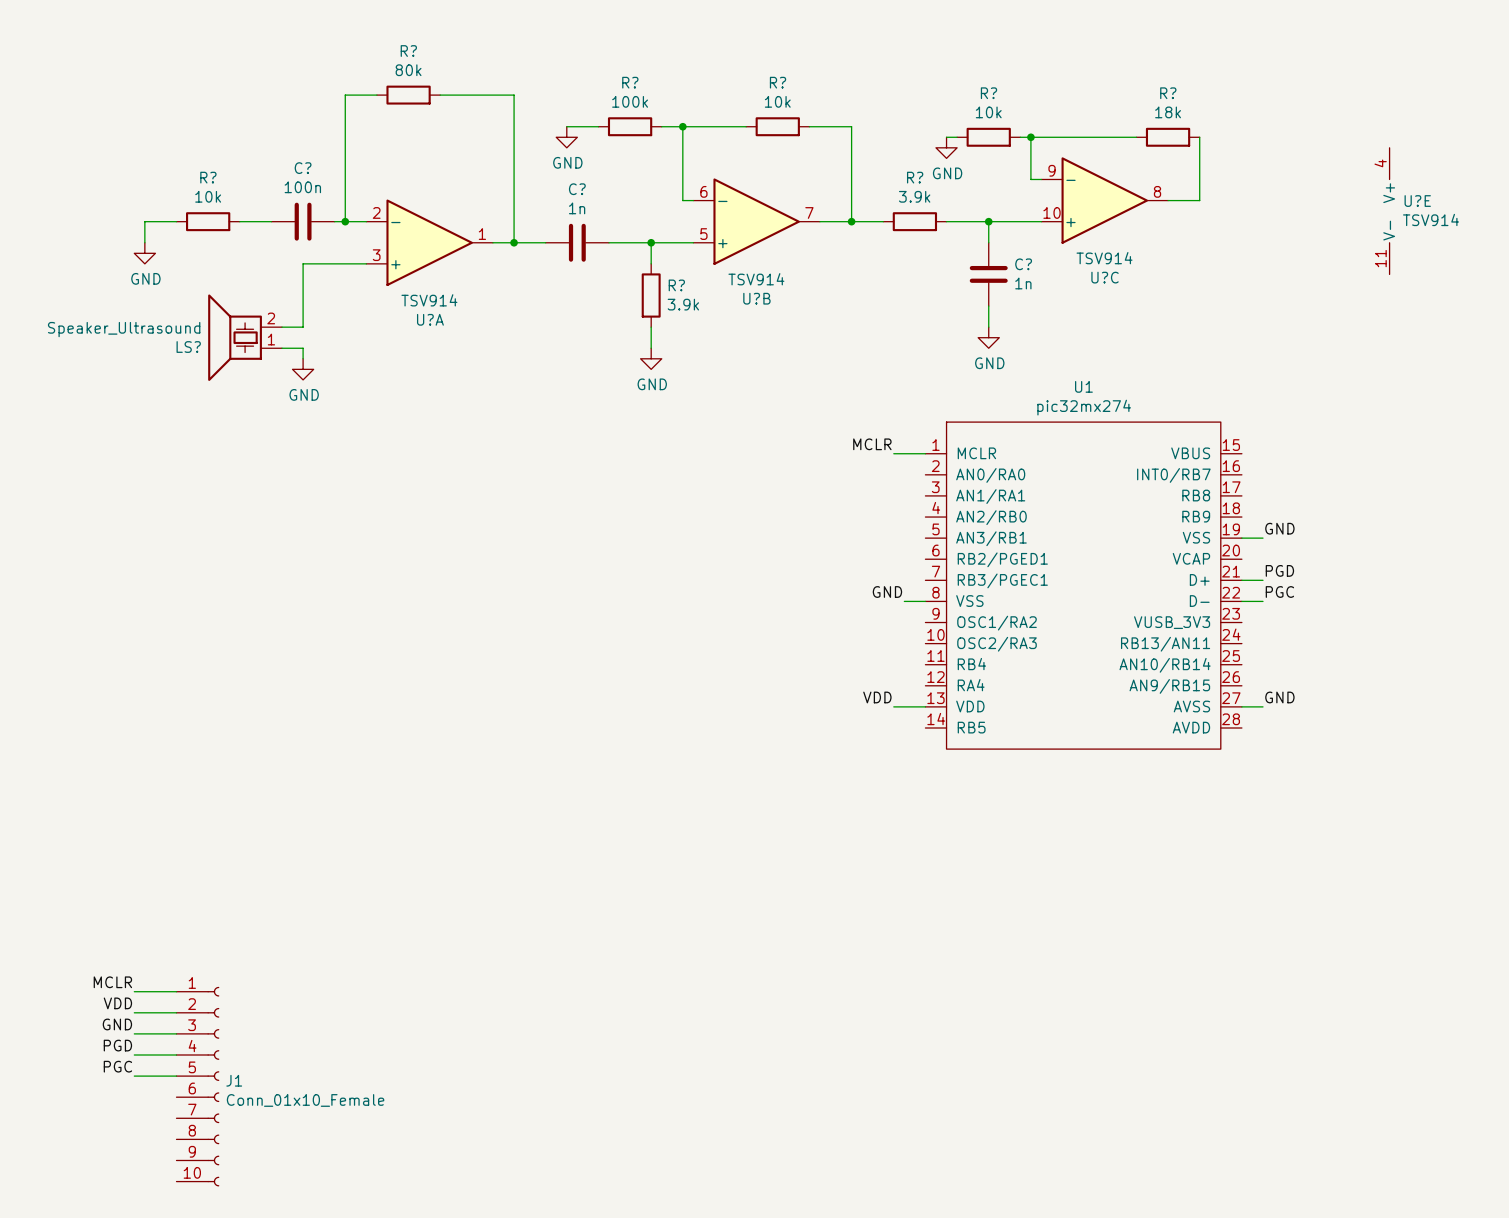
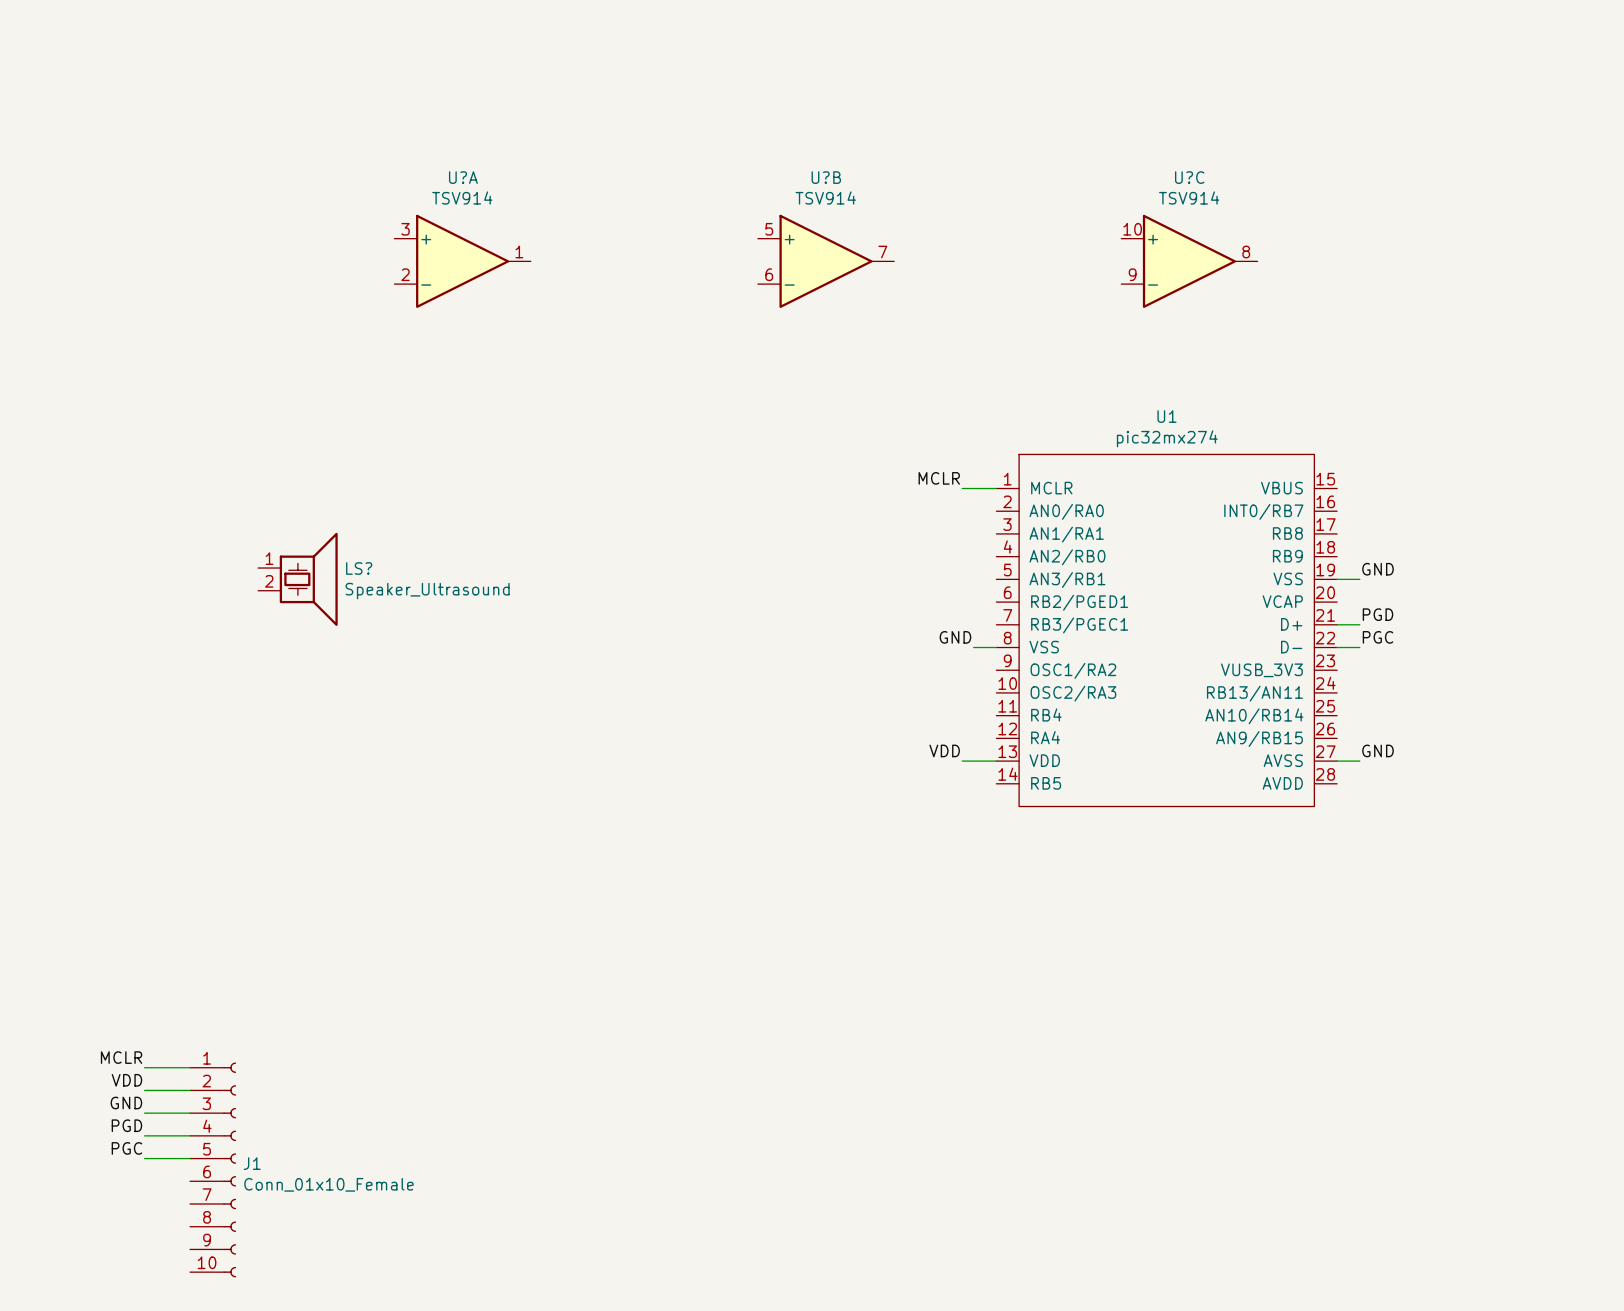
wire: (376, 95) (345, 95) (345, 221) -> none
R?: 80k (408, 95) -> none
wire: (440, 95) (514, 95) (514, 242) -> none
wire: (566, 126) (598, 126) -> none
R?: 100k (630, 126) -> none
wire: (661, 126) (746, 126) -> none
wire: (682, 126) (682, 200) (693, 200) -> none
junction: (682, 126) -> none
R?: 10k (777, 126) -> none
wire: (809, 126) (851, 126) (851, 221) -> none
power symbol: GND (566, 137) -> none
wire: (946, 137) (957, 137) -> none
R?: 10k (988, 137) -> none
wire: (1020, 137) (1136, 137) -> none
wire: (1030, 137) (1030, 179) (1041, 179) -> none
junction: (1030, 137) -> none
R?: 18k (1168, 137) -> none
wire: (1199, 137) (1199, 200) (1168, 200) -> none
power symbol: GND (946, 147) -> none
U?C: TSV914 (1104, 200) -> none
U?E: TSV914 (1389, 211) -> none
wire: (176, 221) (144, 221) (144, 242) -> none
R?: 10k (208, 221) -> none
wire: (239, 221) (271, 221) -> none
C?: 100n (303, 221) -> none
wire: (334, 221) (366, 221) -> none
junction: (345, 221) -> none
U?B: TSV914 (756, 221) -> none
wire: (819, 221) (883, 221) -> none
junction: (851, 221) -> none
R?: 3.9k (914, 221) -> none
wire: (946, 221) (1041, 221) -> none
wire: (988, 221) (988, 242) -> none
junction: (988, 221) -> none
U?A flip: as is (429, 242) -> up-down (462, 261)
wire: (492, 242) (545, 242) -> none
junction: (514, 242) -> none
C?: 1n (577, 242) -> none
wire: (608, 242) (693, 242) -> none
wire: (651, 242) (651, 263) -> none
junction: (651, 242) -> none
U?B: none -> TSV914 (826, 261)
U?C: none -> TSV914 (1189, 261)
power symbol: GND (144, 253) -> none
wire: (366, 263) (303, 263) (303, 327) (281, 327) -> none
C?: 1n (988, 274) -> none
R?: 3.9k (651, 295) -> none
wire: (988, 306) (988, 327) -> none
wire: (651, 327) (651, 348) -> none
LS? rotation: 0° (235, 337) -> 180° (308, 579)
LS? position: (245, 337) -> (297, 579)
power symbol: GND (988, 337) -> none
wire: (281, 348) (303, 348) (303, 358) -> none
power symbol: GND (651, 358) -> none
power symbol: GND (303, 369) -> none

